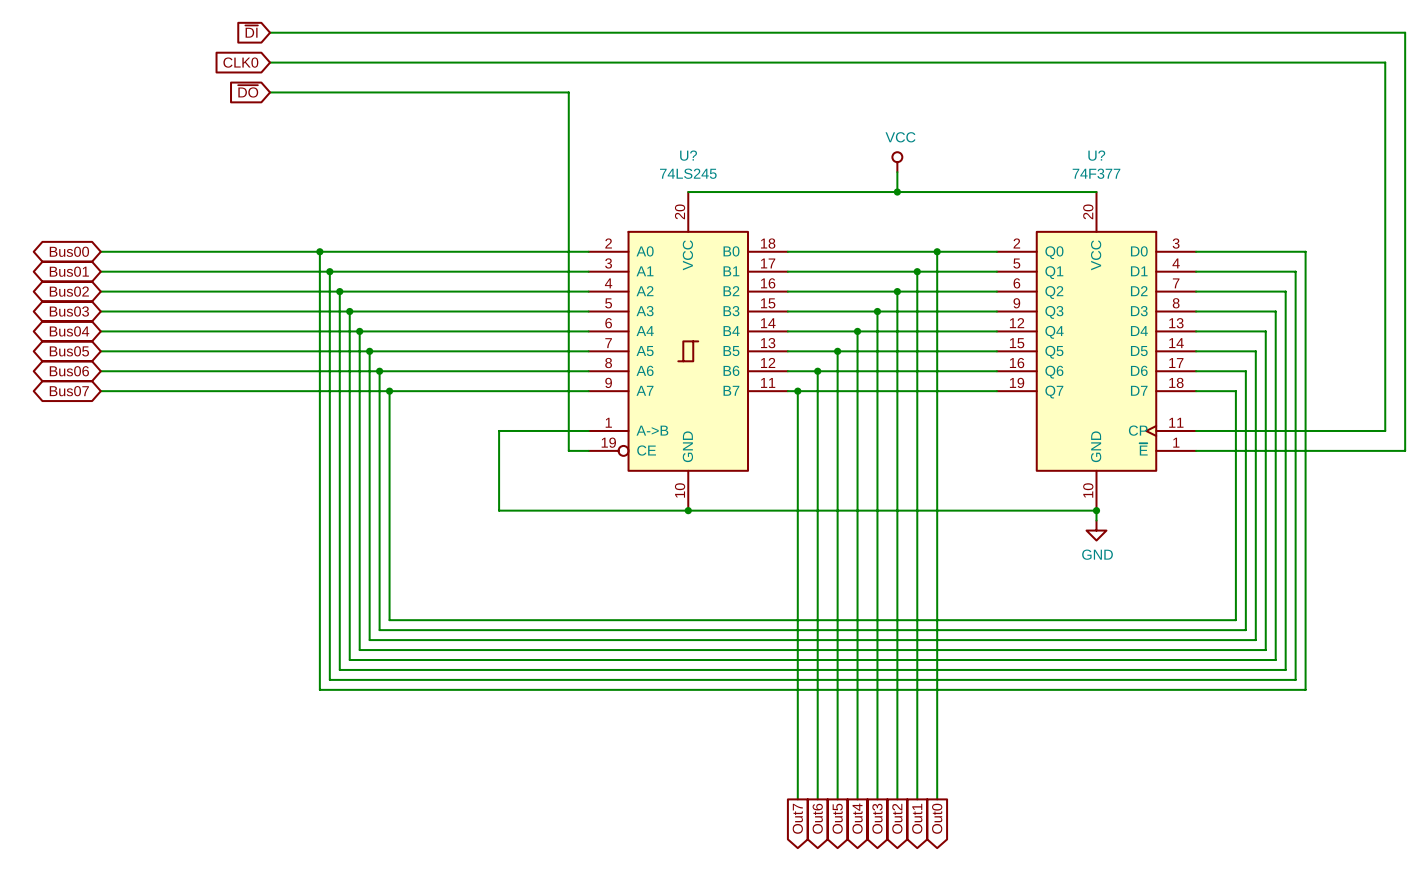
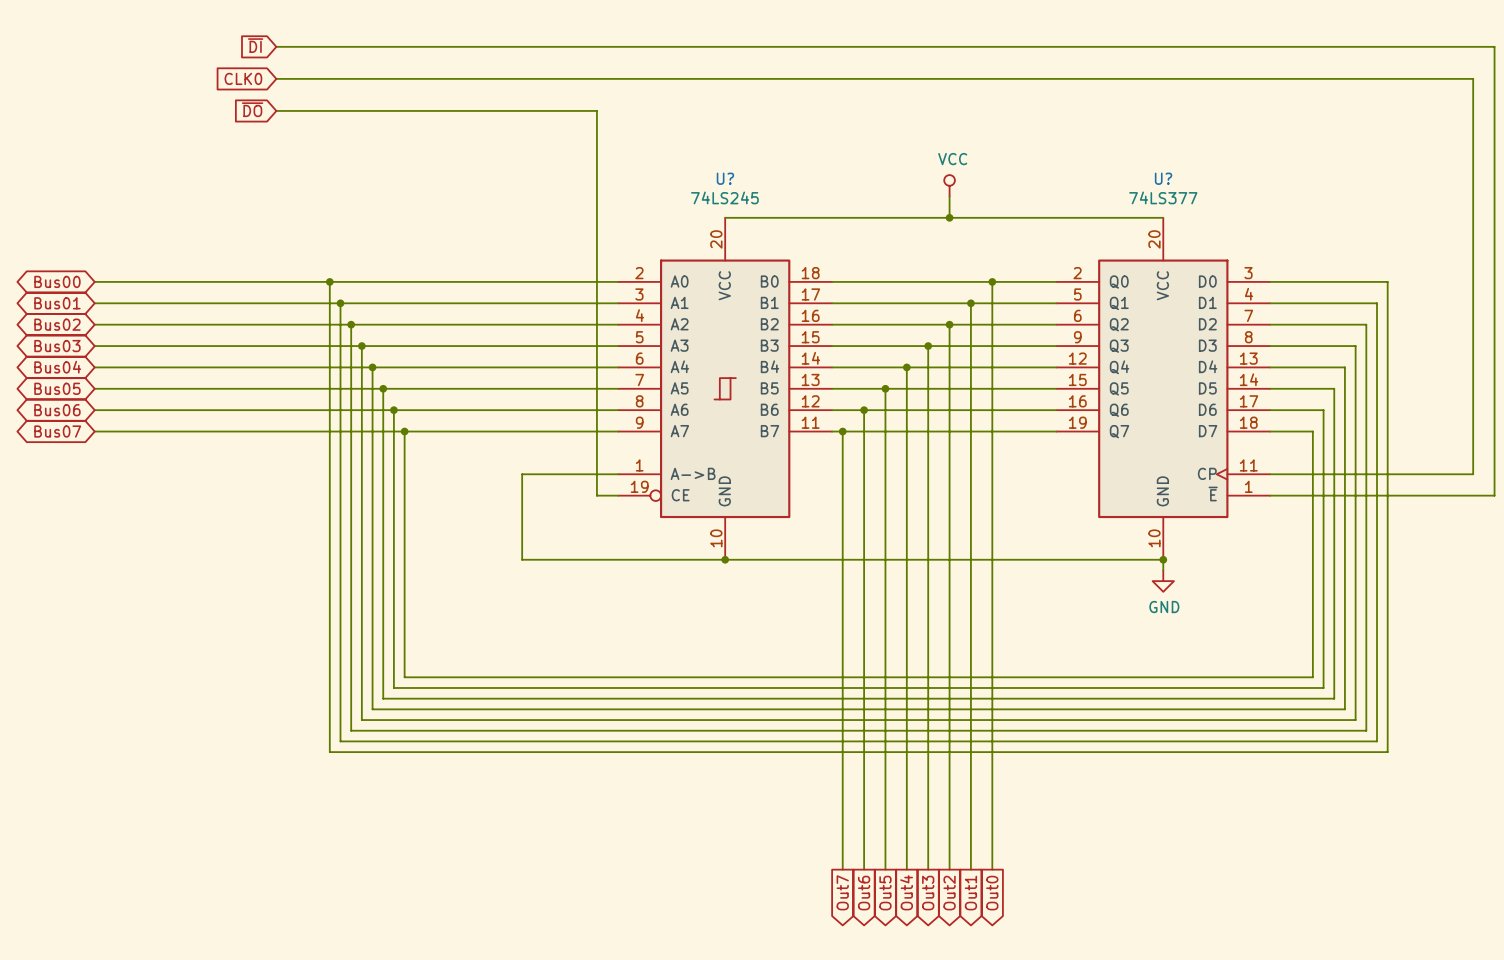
U? value: 74F377 (1096, 173) -> 74LS377 (1163, 197)

